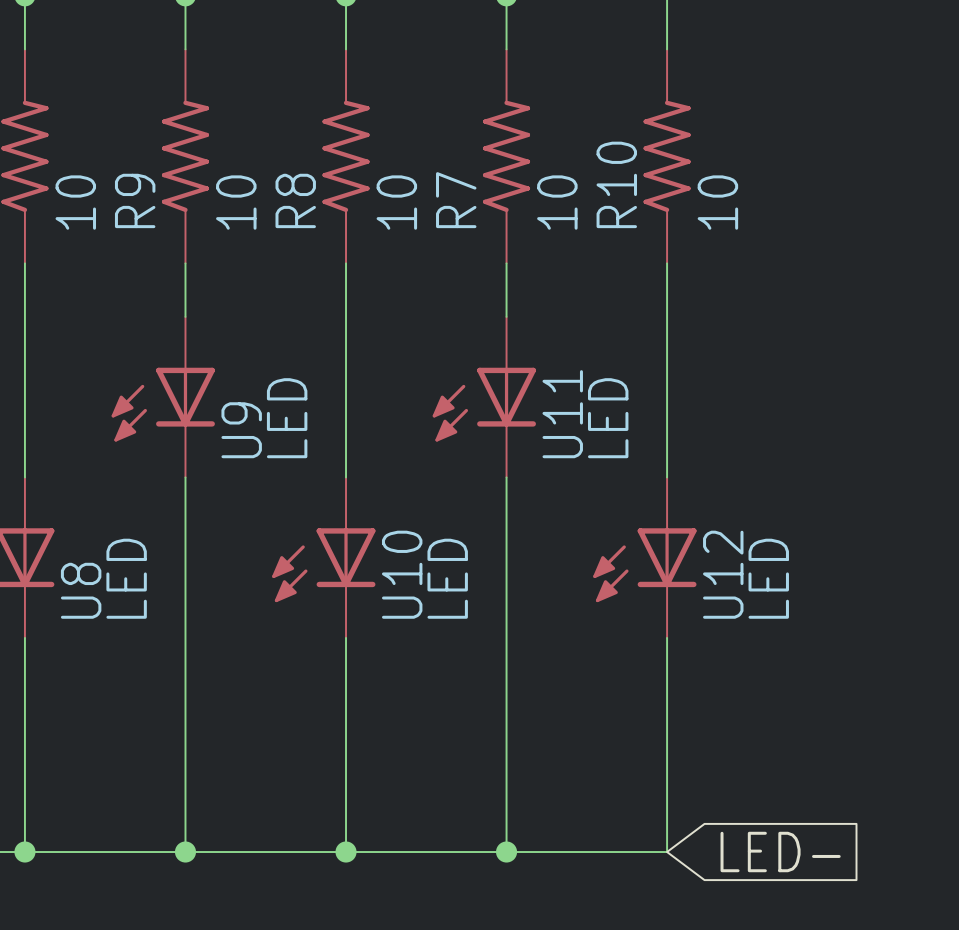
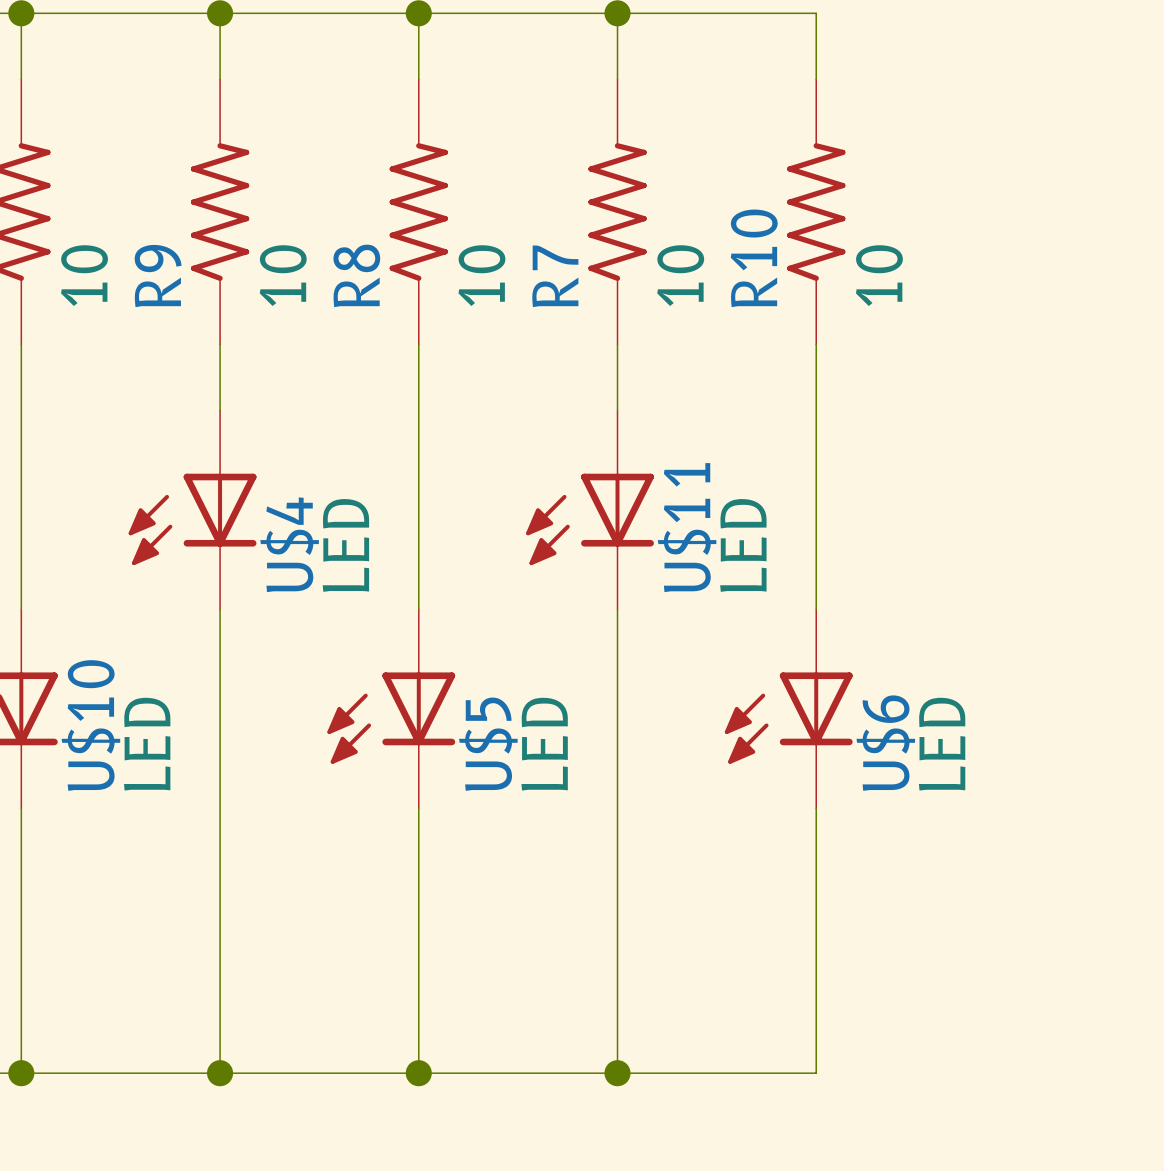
U11 name: U11 (562, 414) -> U$11 (687, 527)
U9 name: U9 (241, 430) -> U$4 (289, 544)
U10 name: U10 (402, 574) -> U$5 (488, 744)
U12 name: U12 (723, 574) -> U$6 (885, 743)
U8 name: U8 (81, 590) -> U$10 (90, 725)
global label: LED- (780, 852) -> none

